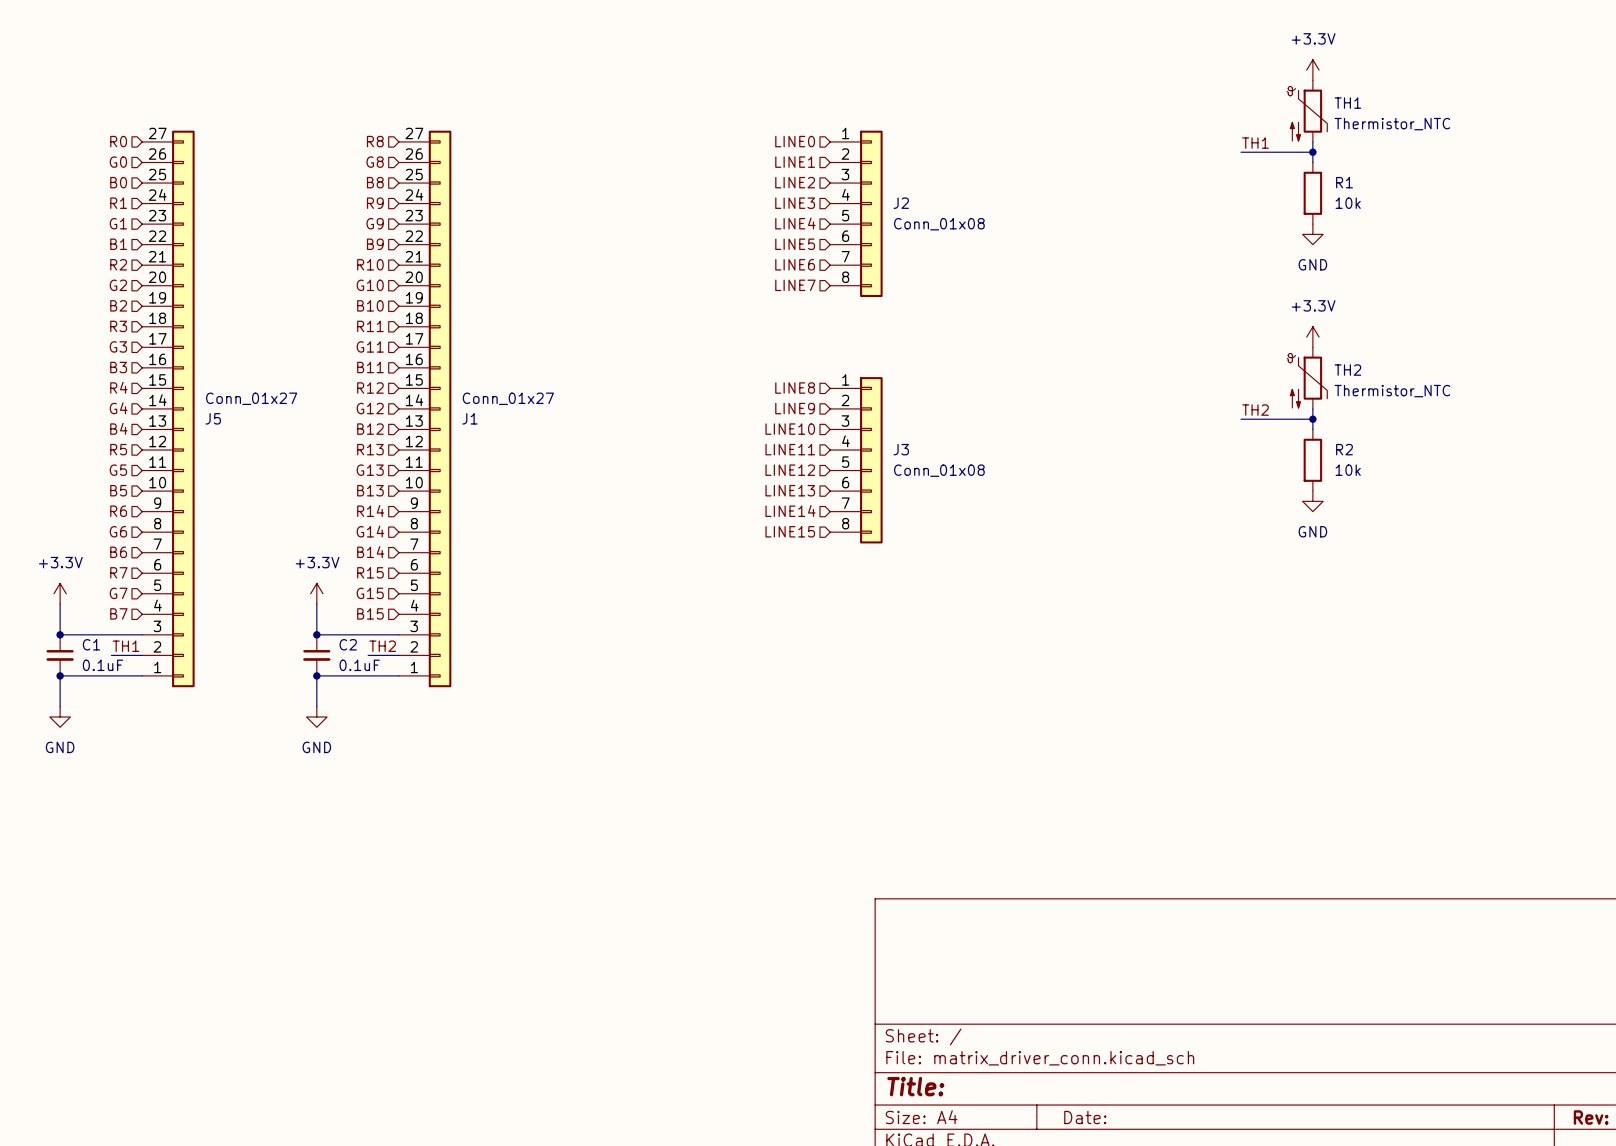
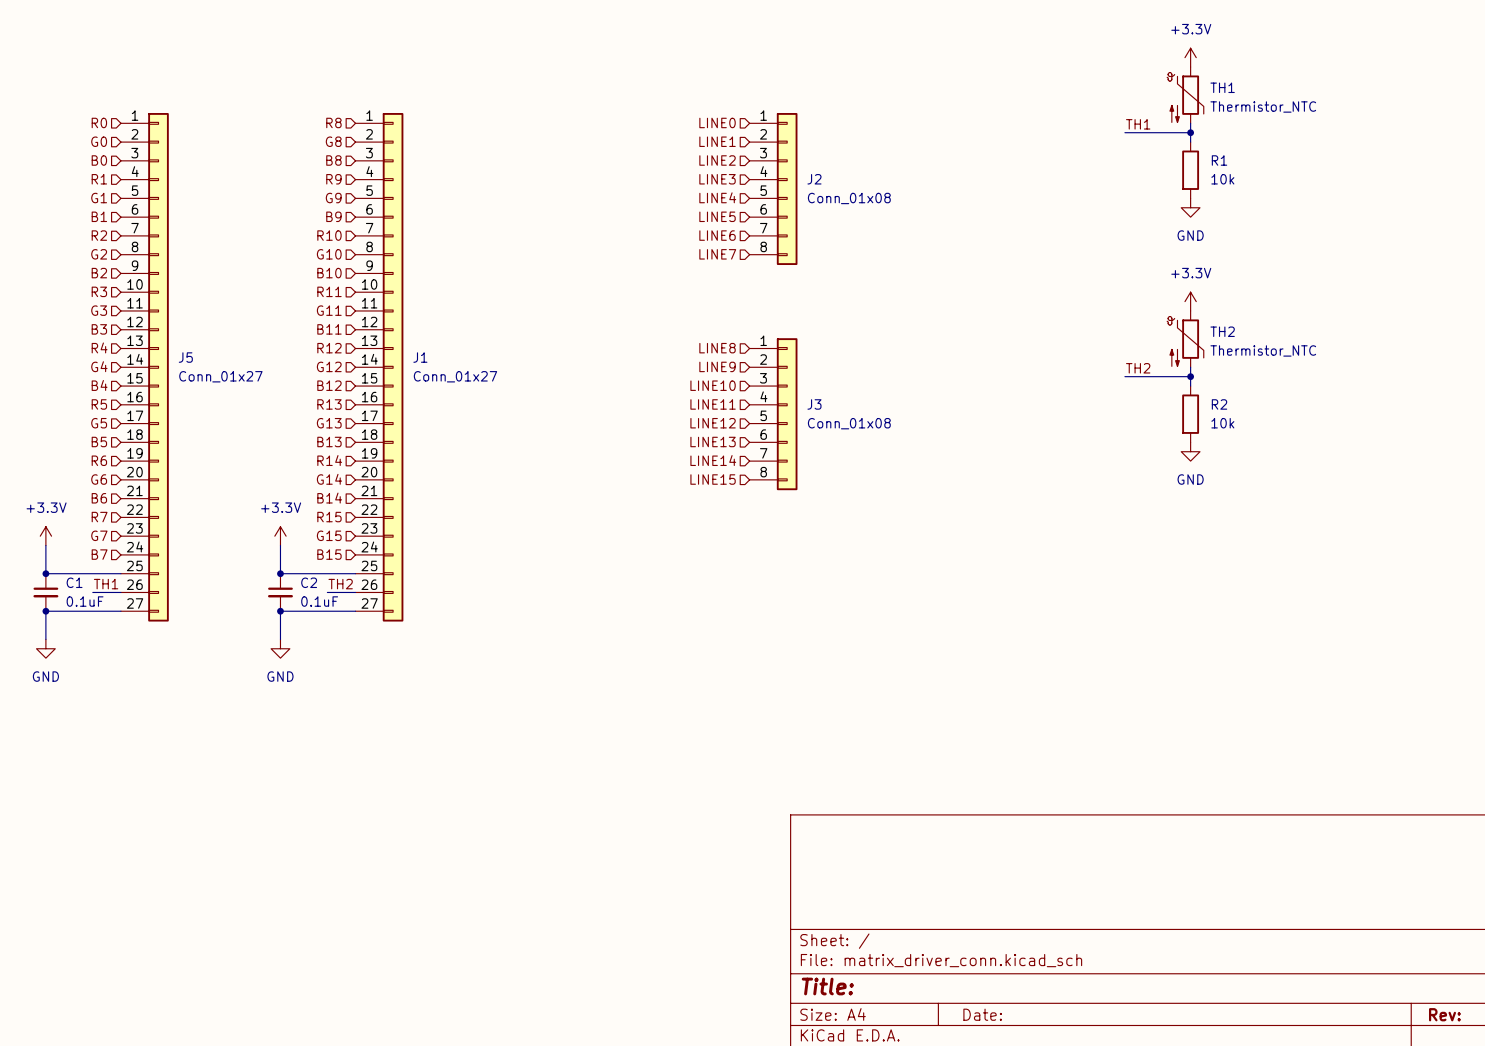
J5 flip: as is (183, 408) -> up-down (158, 367)
J1 flip: as is (440, 408) -> up-down (393, 367)

